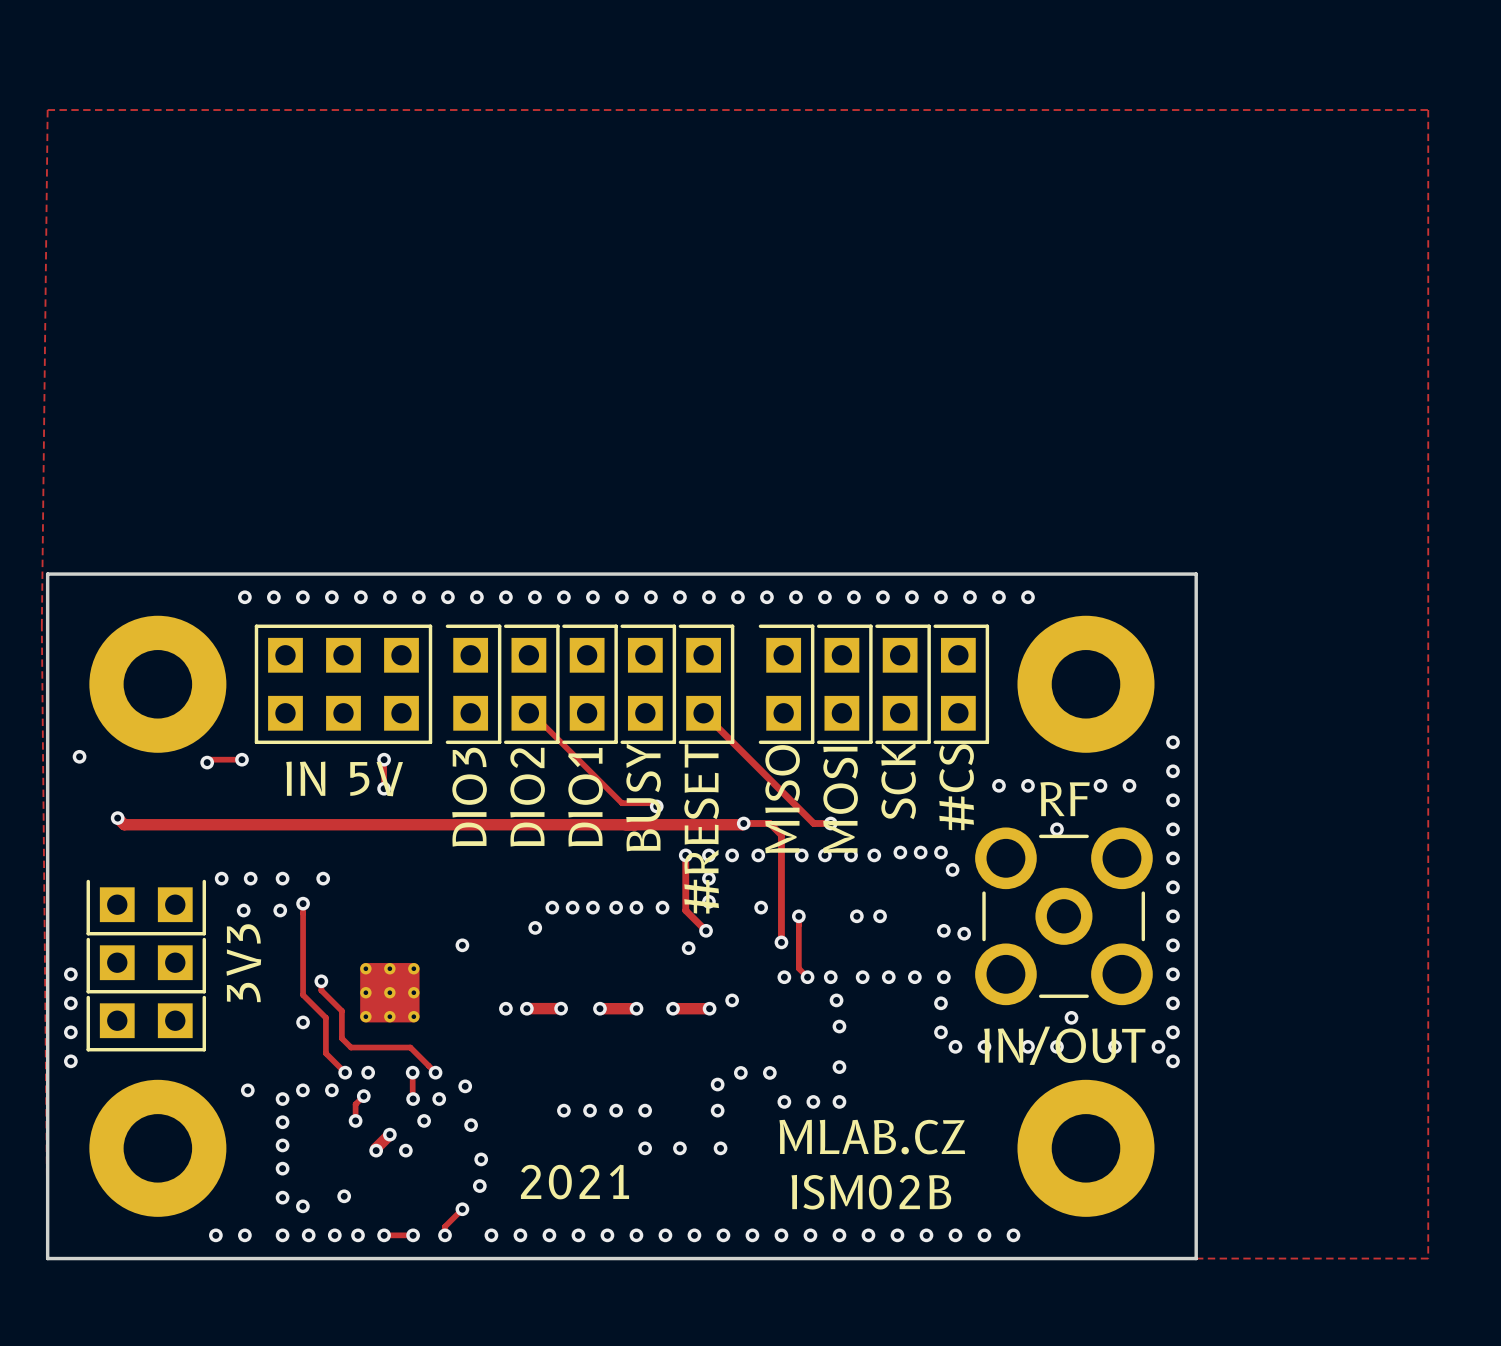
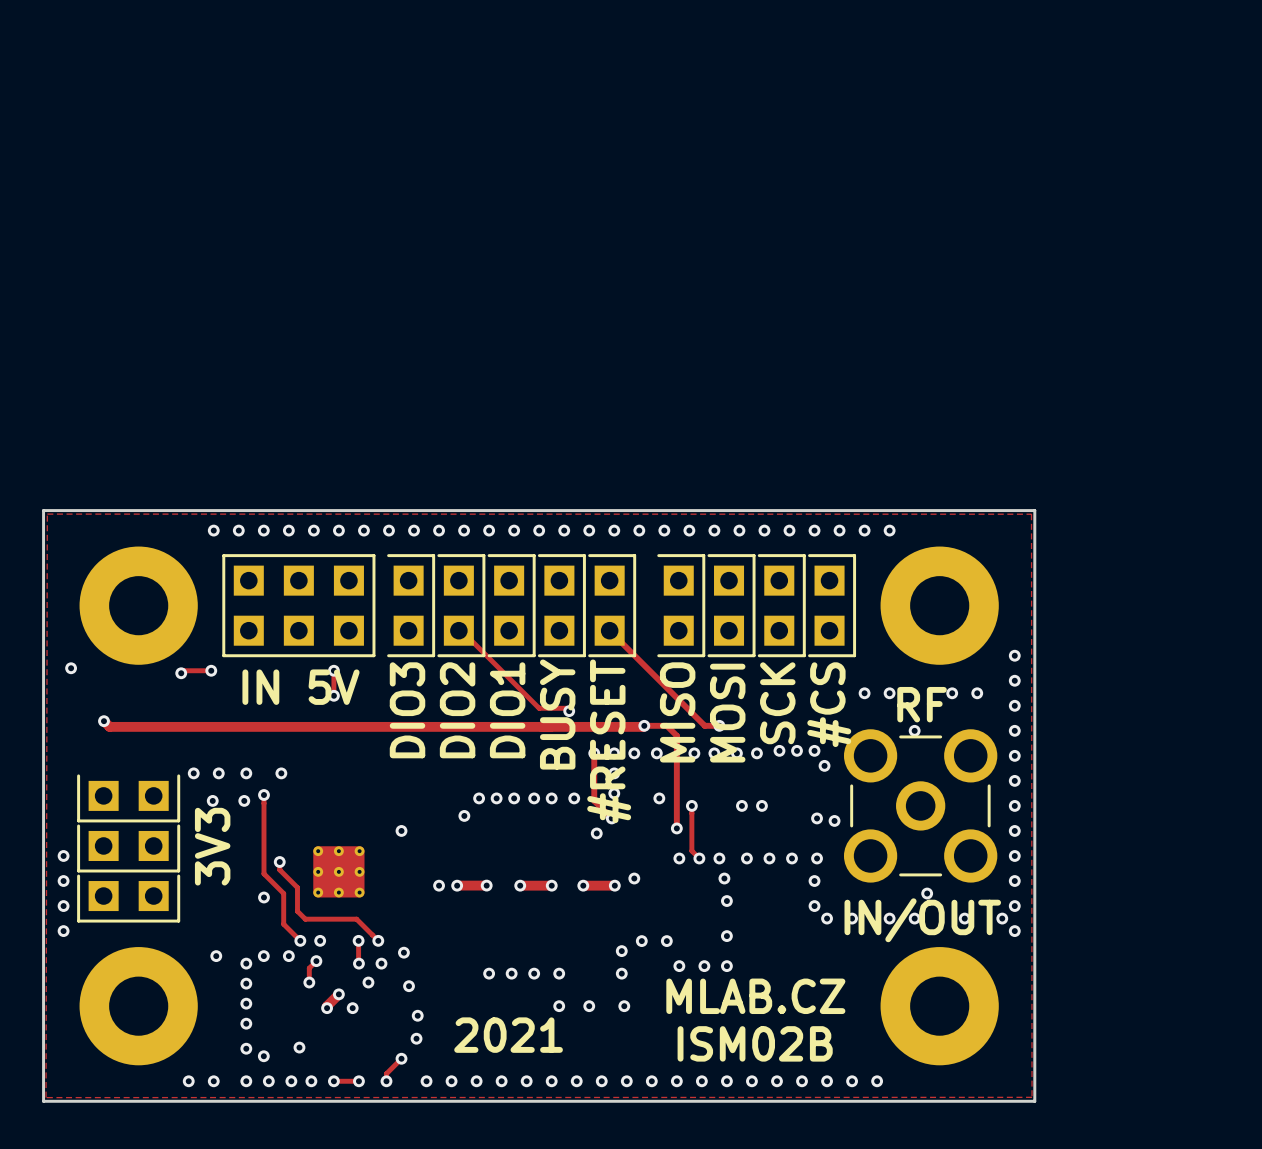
zone outline: (47, 110) (1428, 110) (1428, 1258) (47, 1258) (41, 626) (47, 110) -> none
zone outline: none -> (47, 514) (1031, 514) (1032, 1097) (46, 1097) (47, 514)

